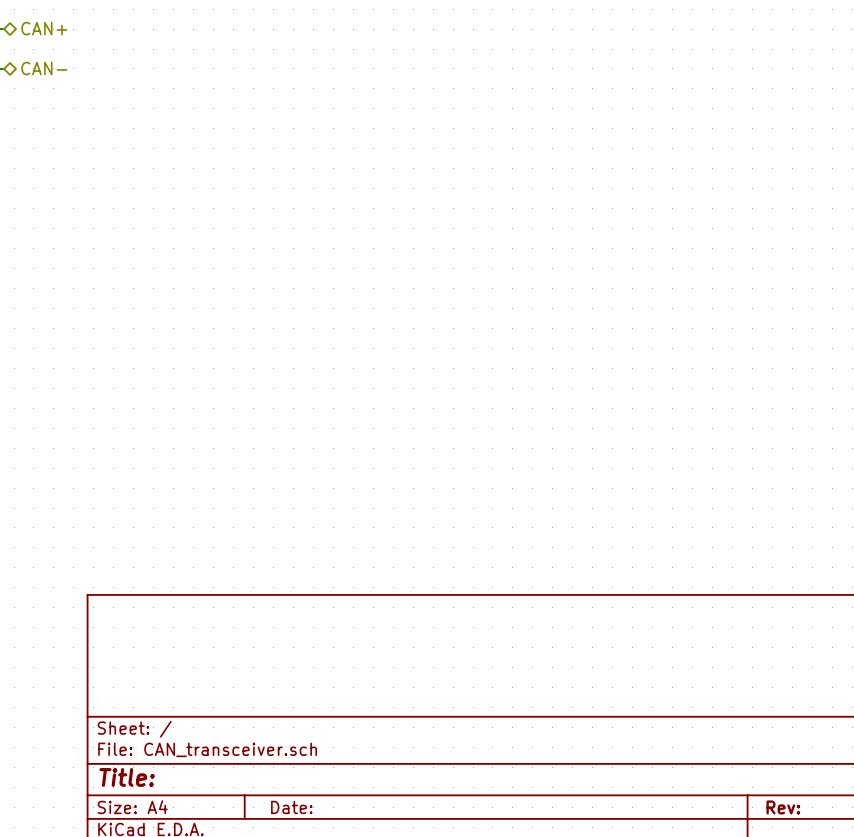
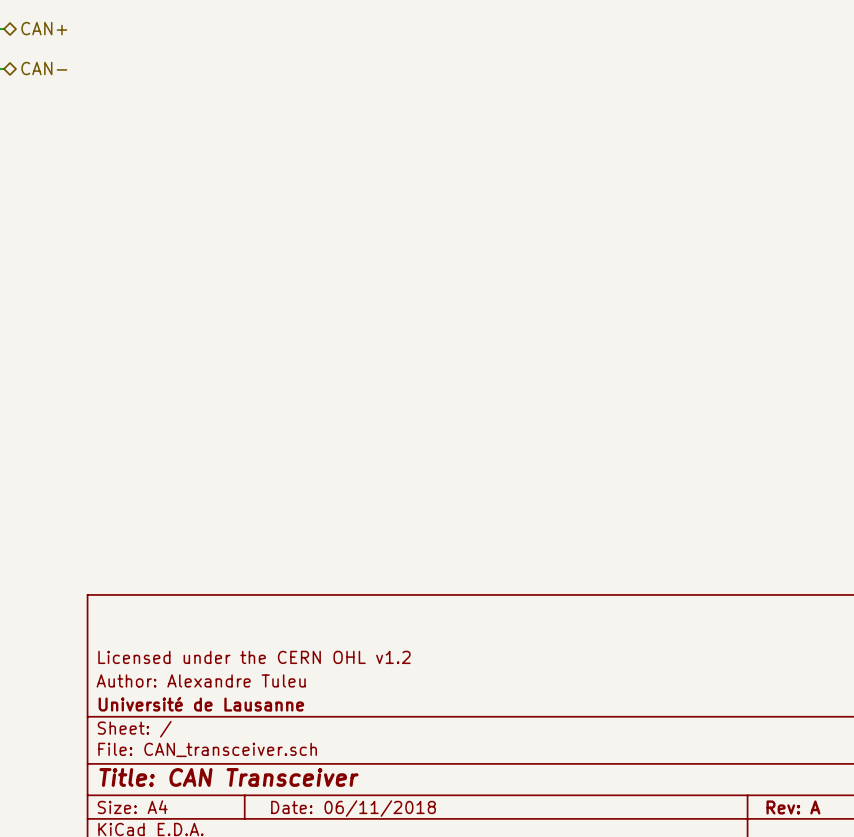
title block: none -> Licensed under the CERN OHL v1.2 (254, 657)
title block: none -> Author: Alexandre Tuleu (201, 680)
title block: none -> Université de Lausanne (201, 704)
title block: Title: (127, 777) -> Title: CAN Transceiver (228, 777)
title block: Date: (291, 807) -> Date: 06/11/2018 (353, 808)
title block: Rev: (783, 807) -> Rev: A (793, 807)

